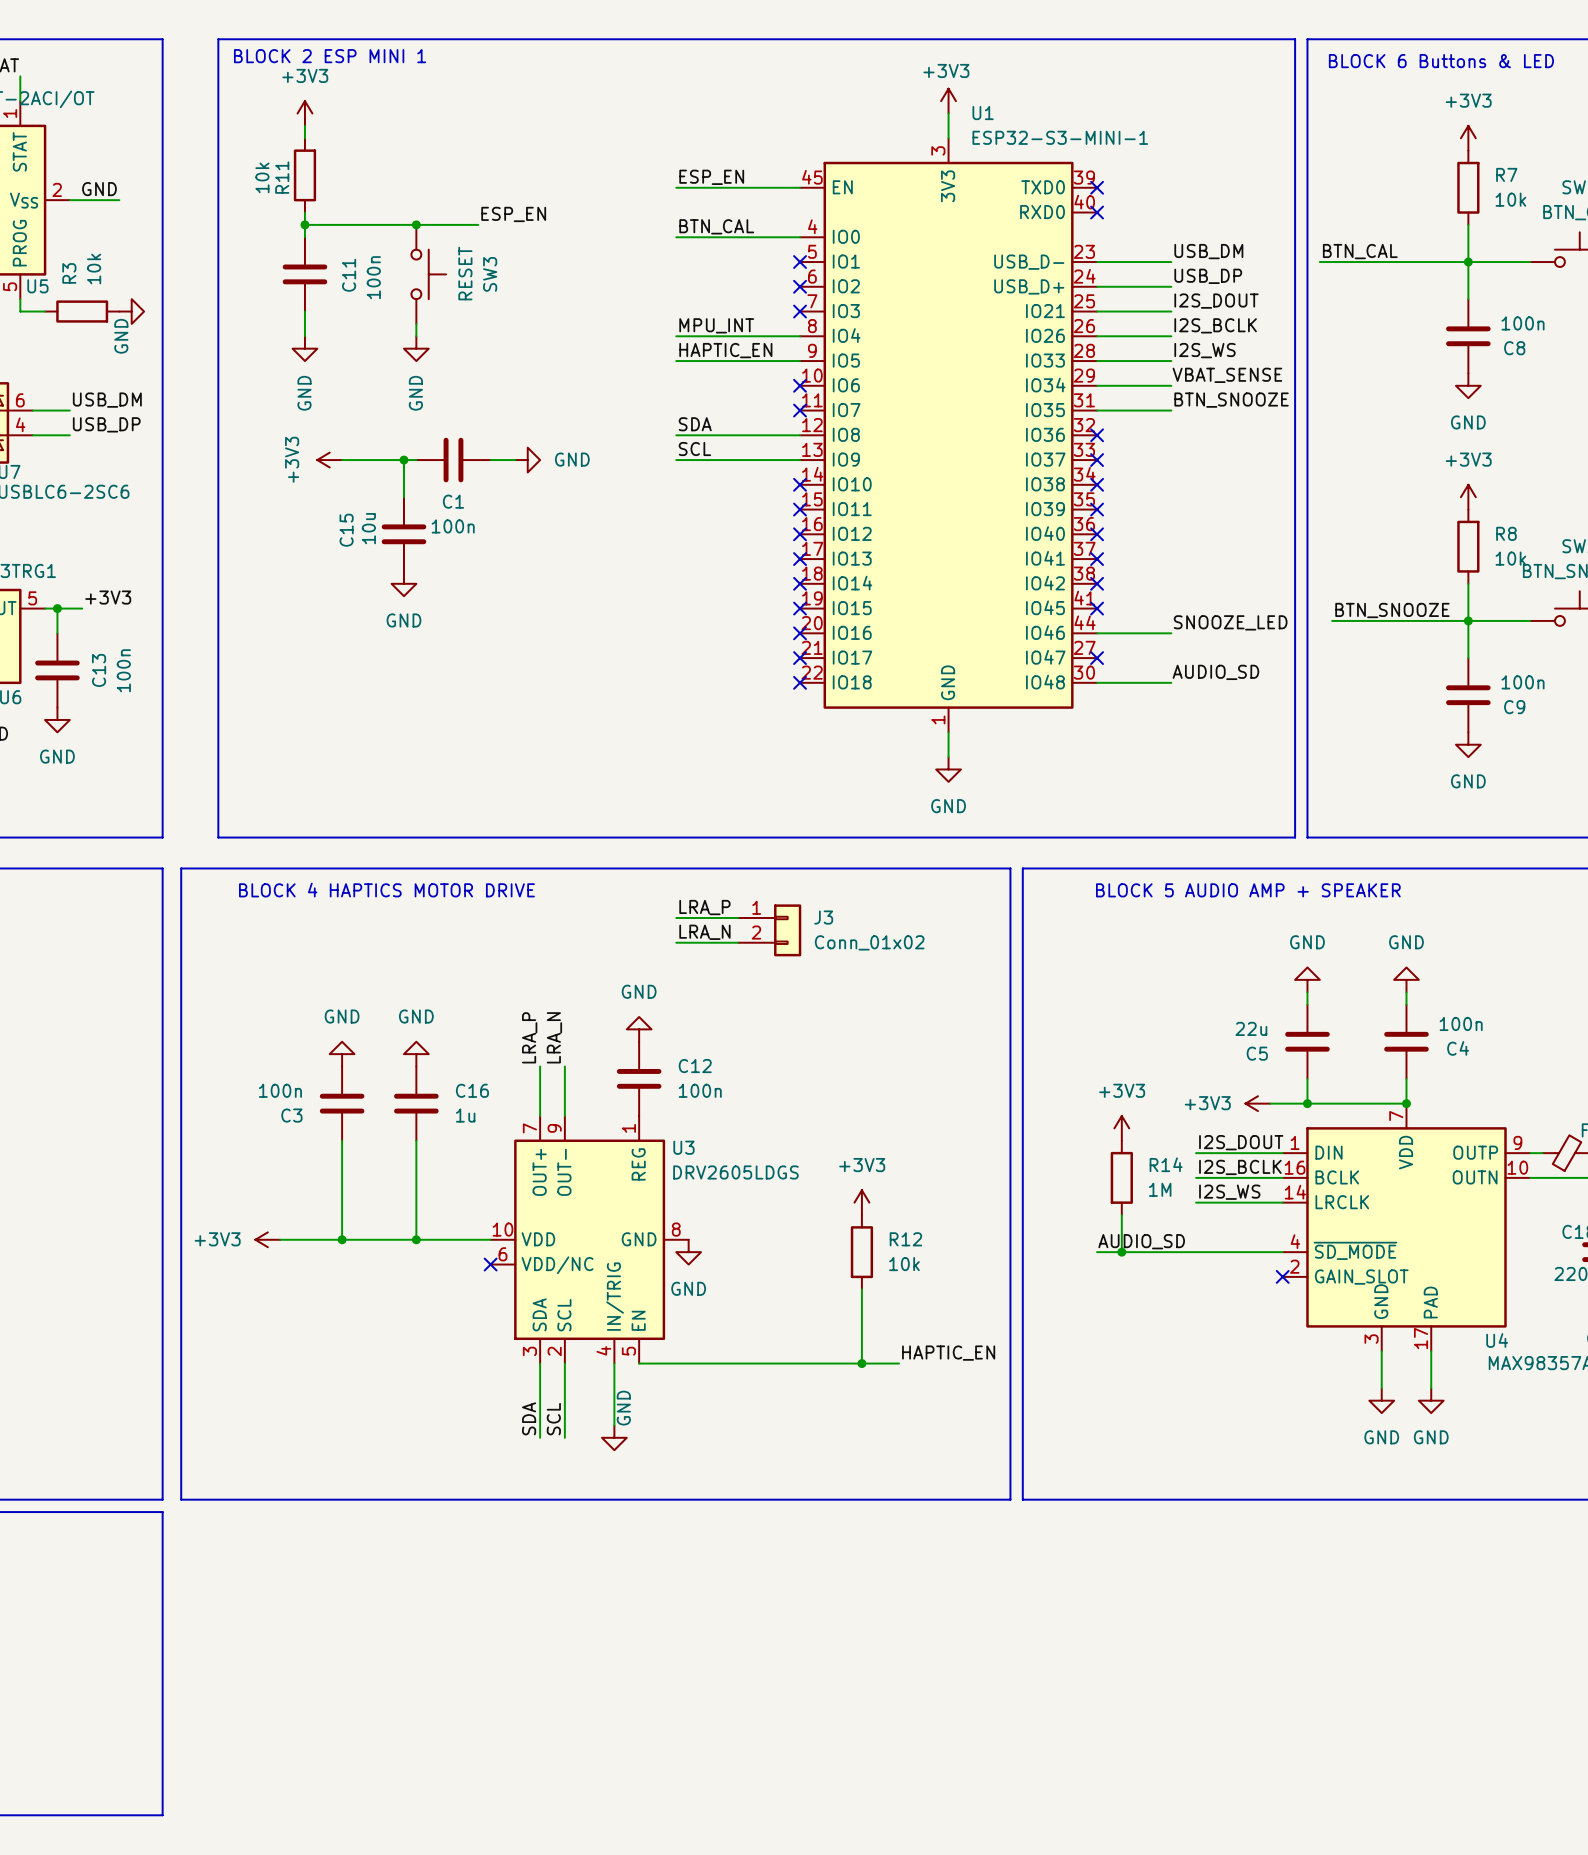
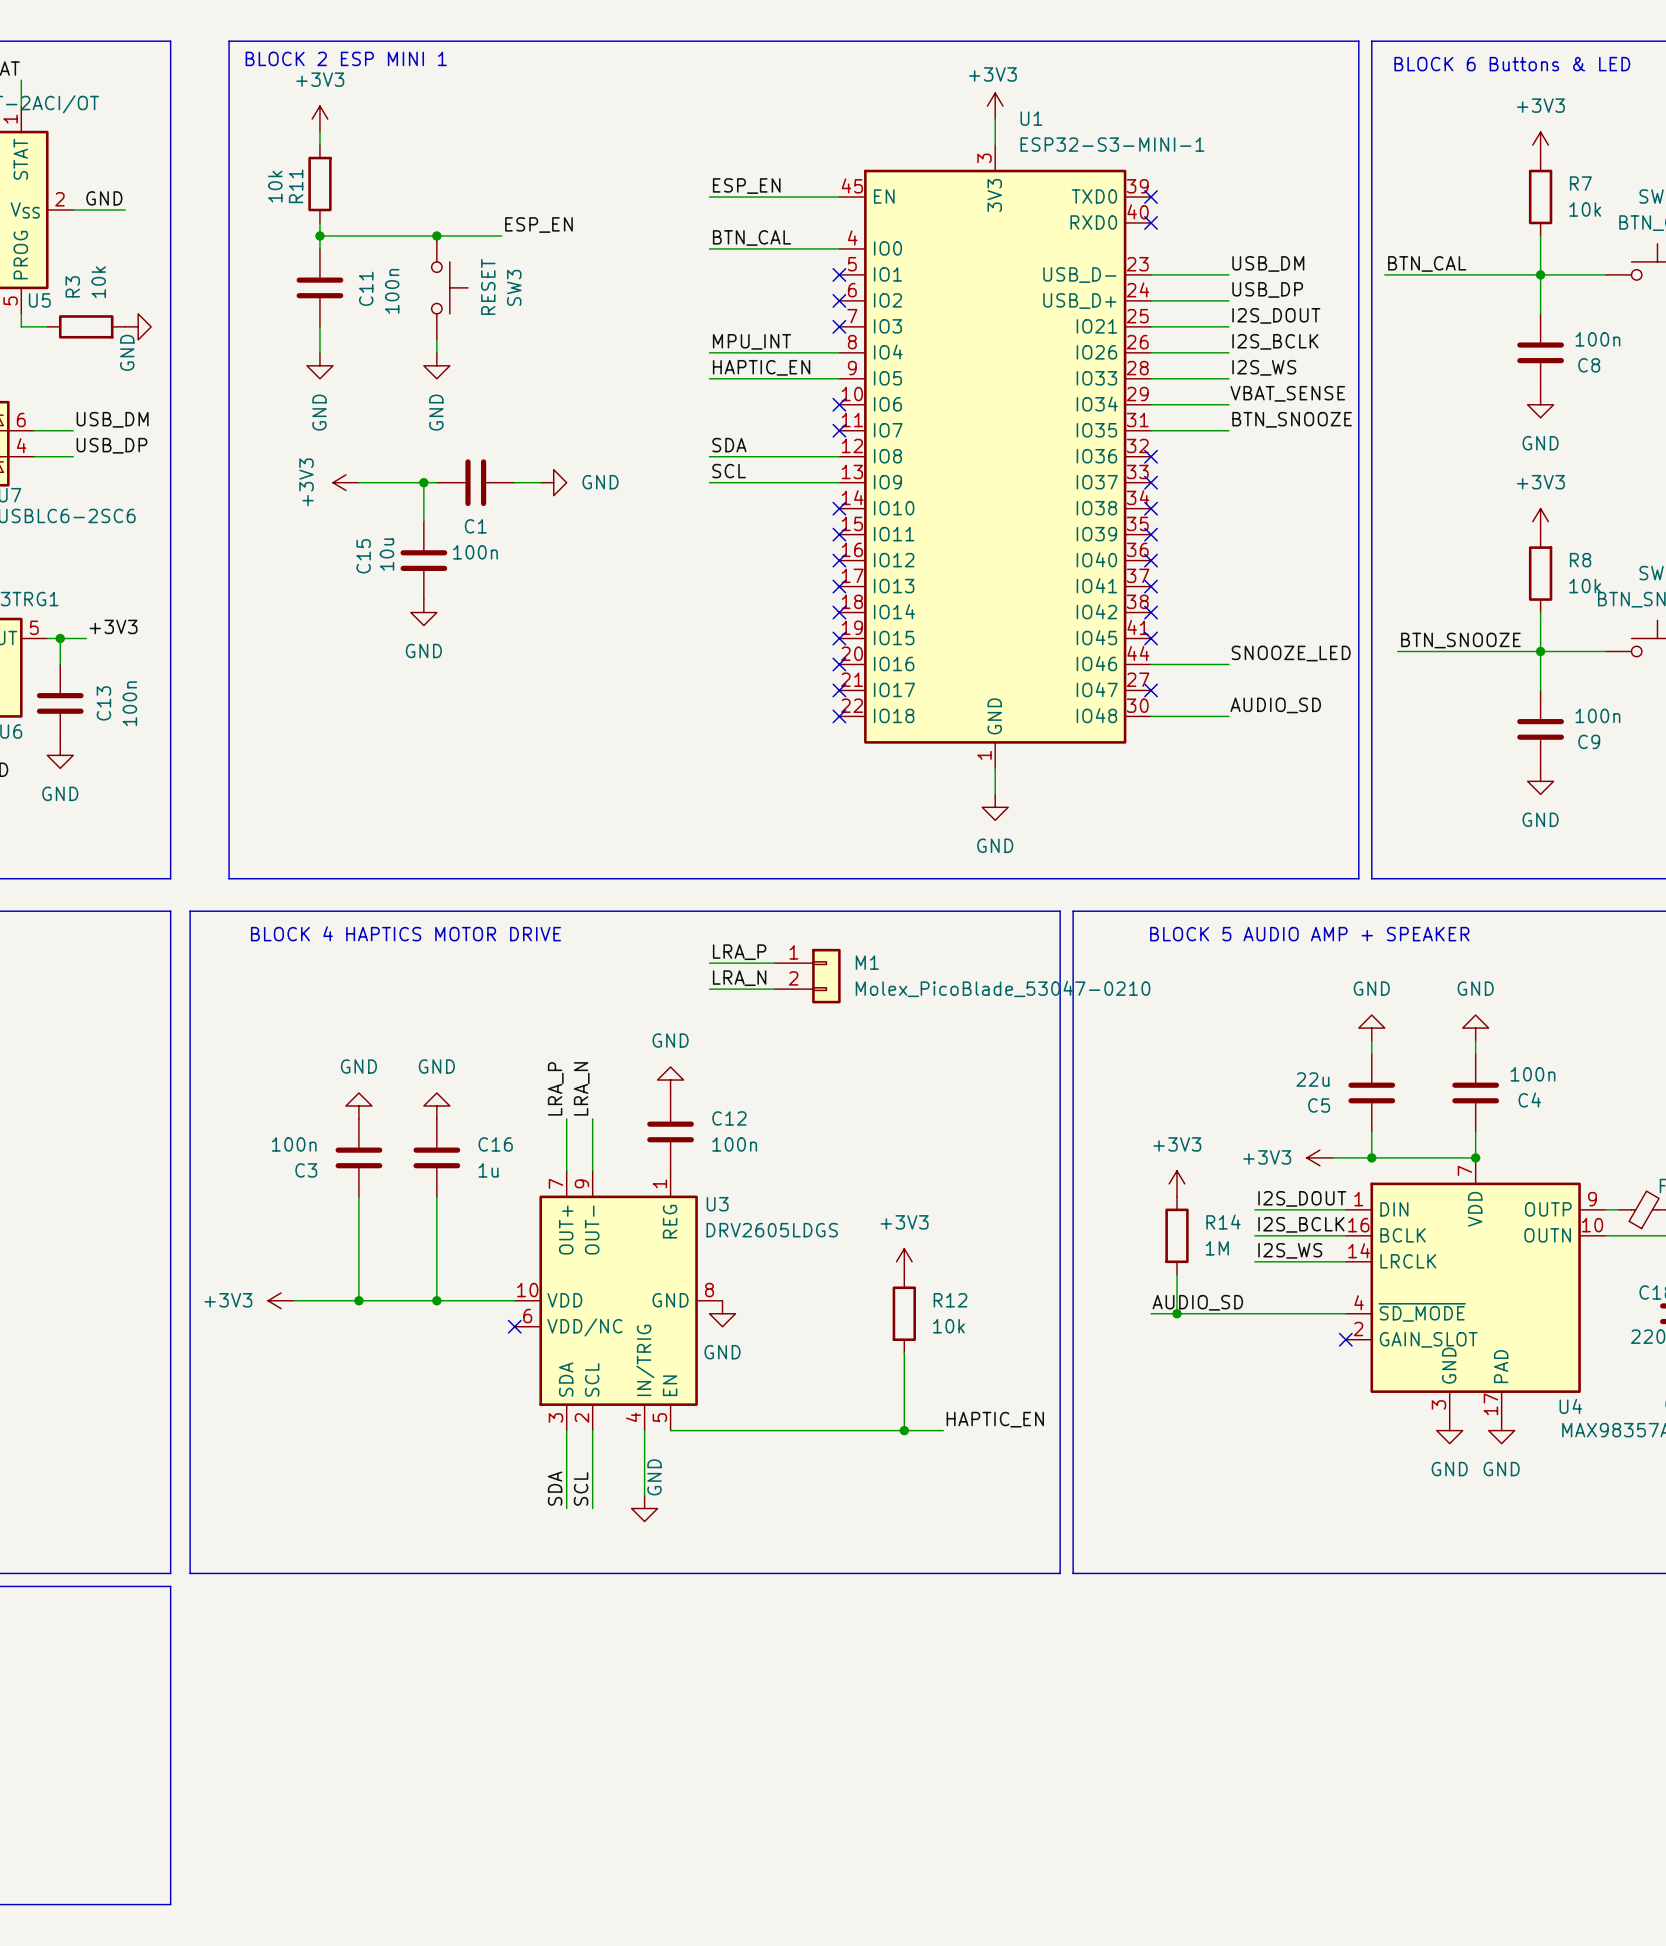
J3 name: J3 (823, 917) -> M1 (867, 962)
J3 value: Conn_01x02 (869, 942) -> Molex_PicoBlade_53047-0210 (1003, 988)
wire: (1381, 1351) (1381, 1388) -> none
wire: (1431, 1351) (1431, 1388) -> none
power symbol: none -> GND (1449, 1430)
power symbol: none -> GND (1501, 1430)
power symbol: GND (1381, 1400) -> none
power symbol: GND (1431, 1400) -> none

